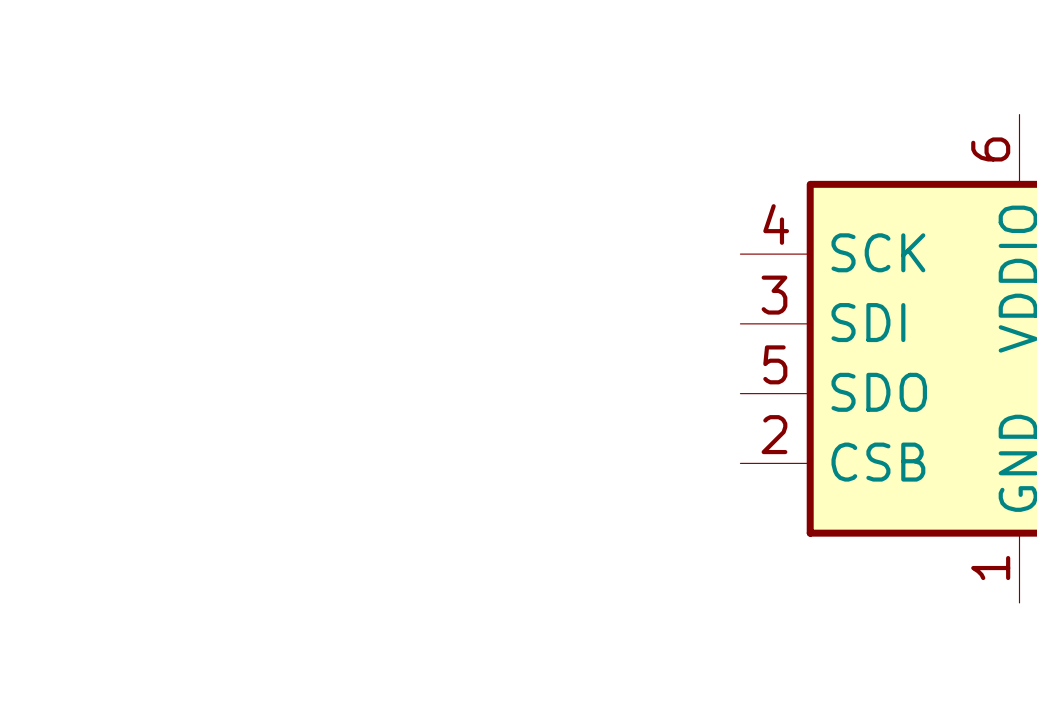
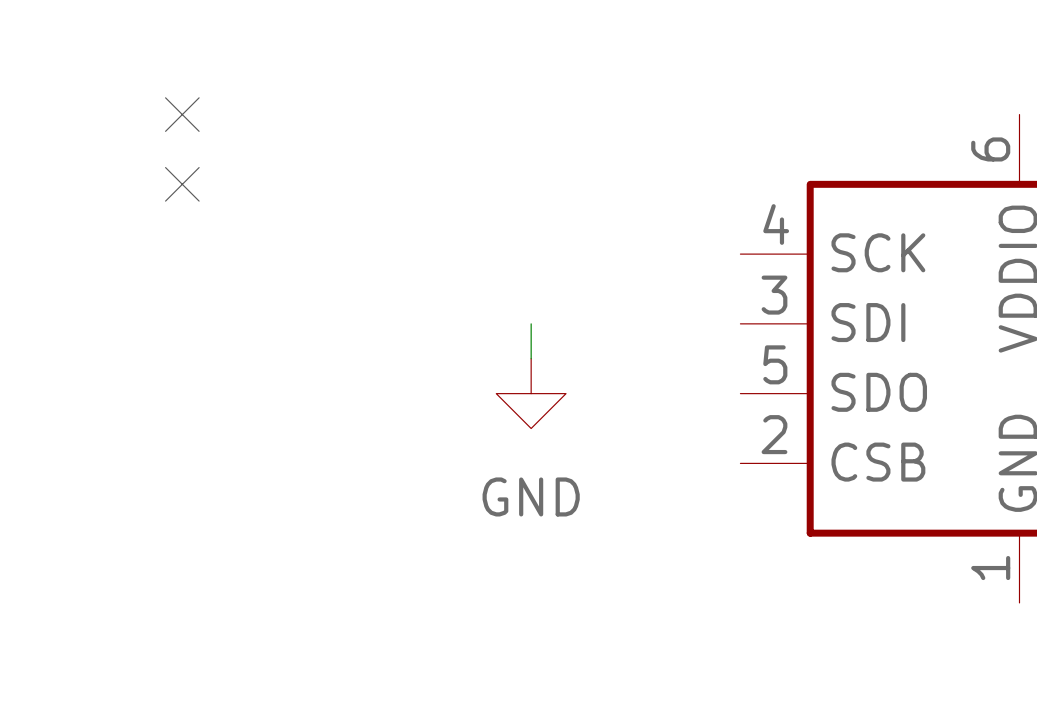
no-connect mark: none -> (182, 114)
no-connect mark: none -> (182, 184)
wire: none -> (531, 323) (531, 358)
power symbol: none -> GND (531, 393)

